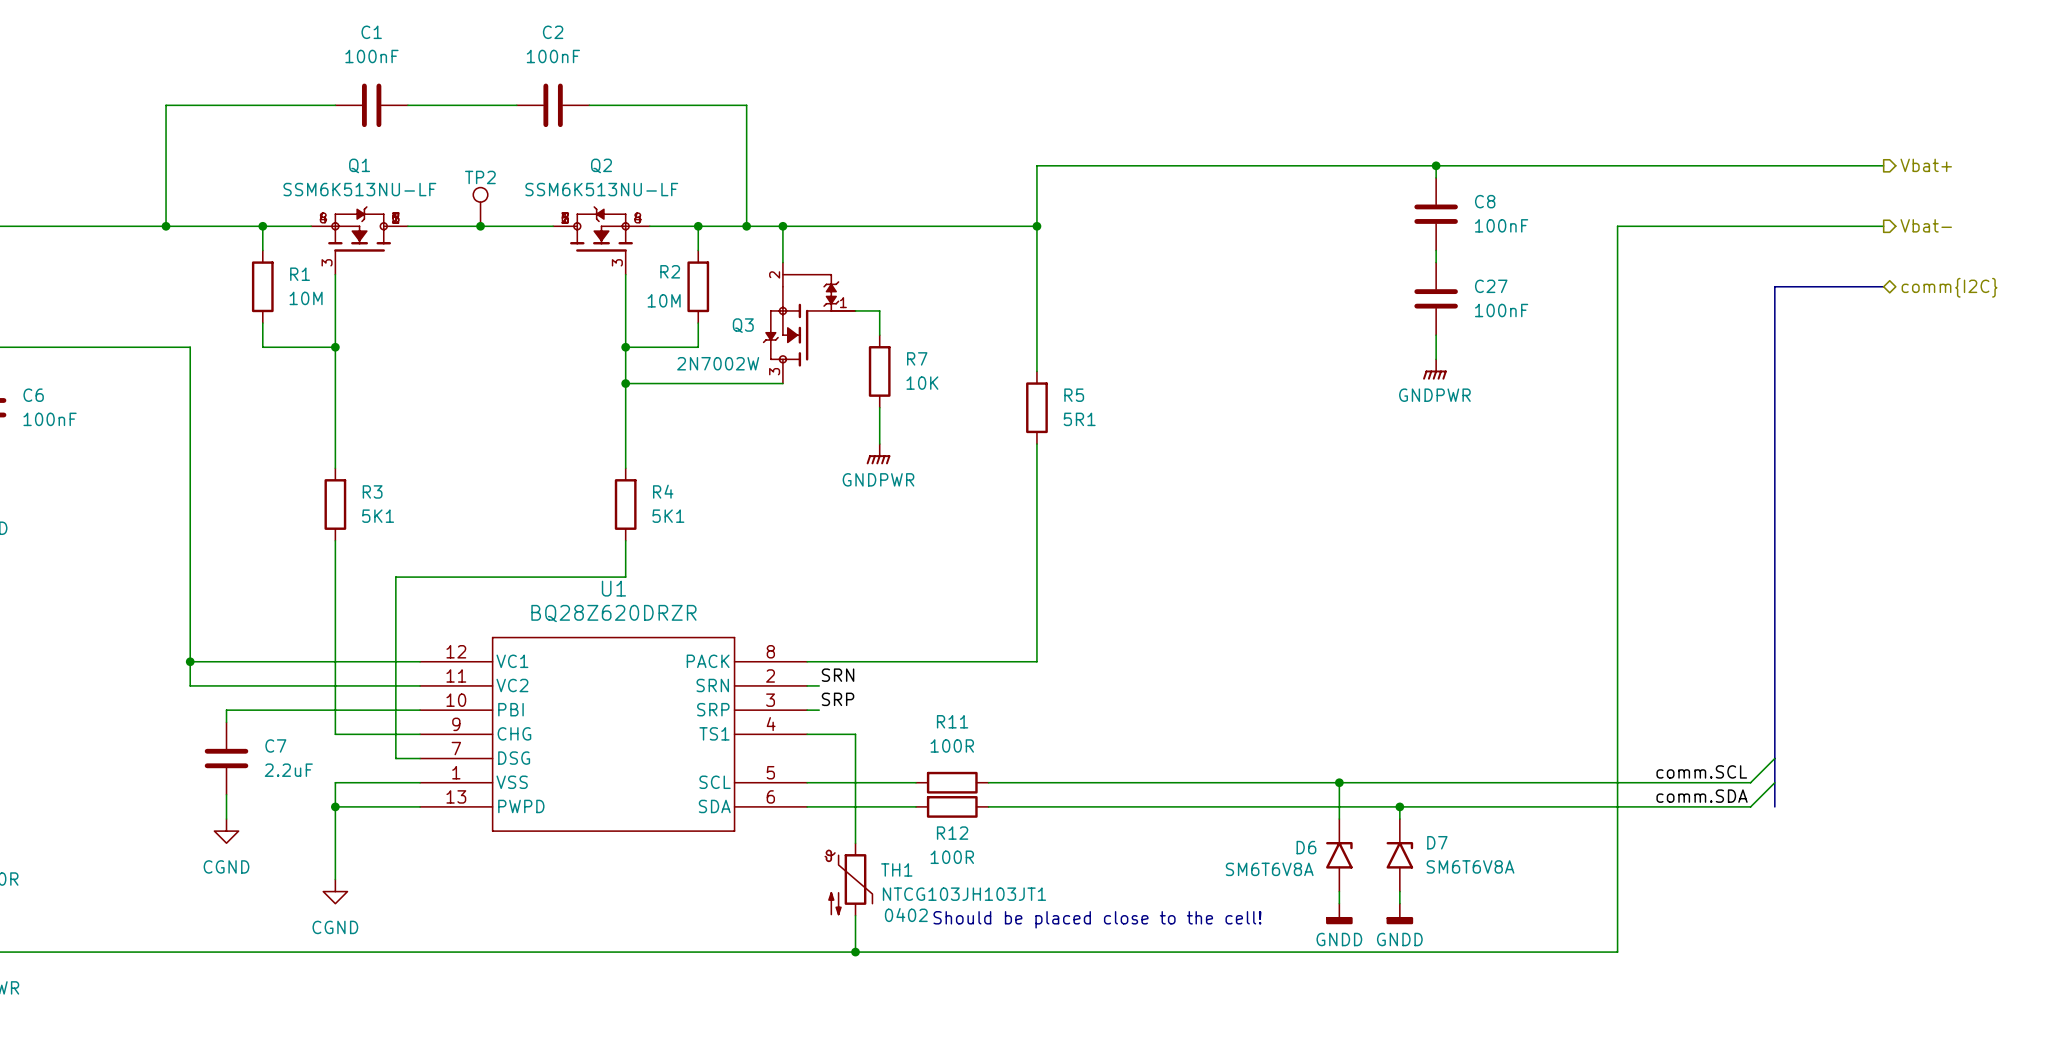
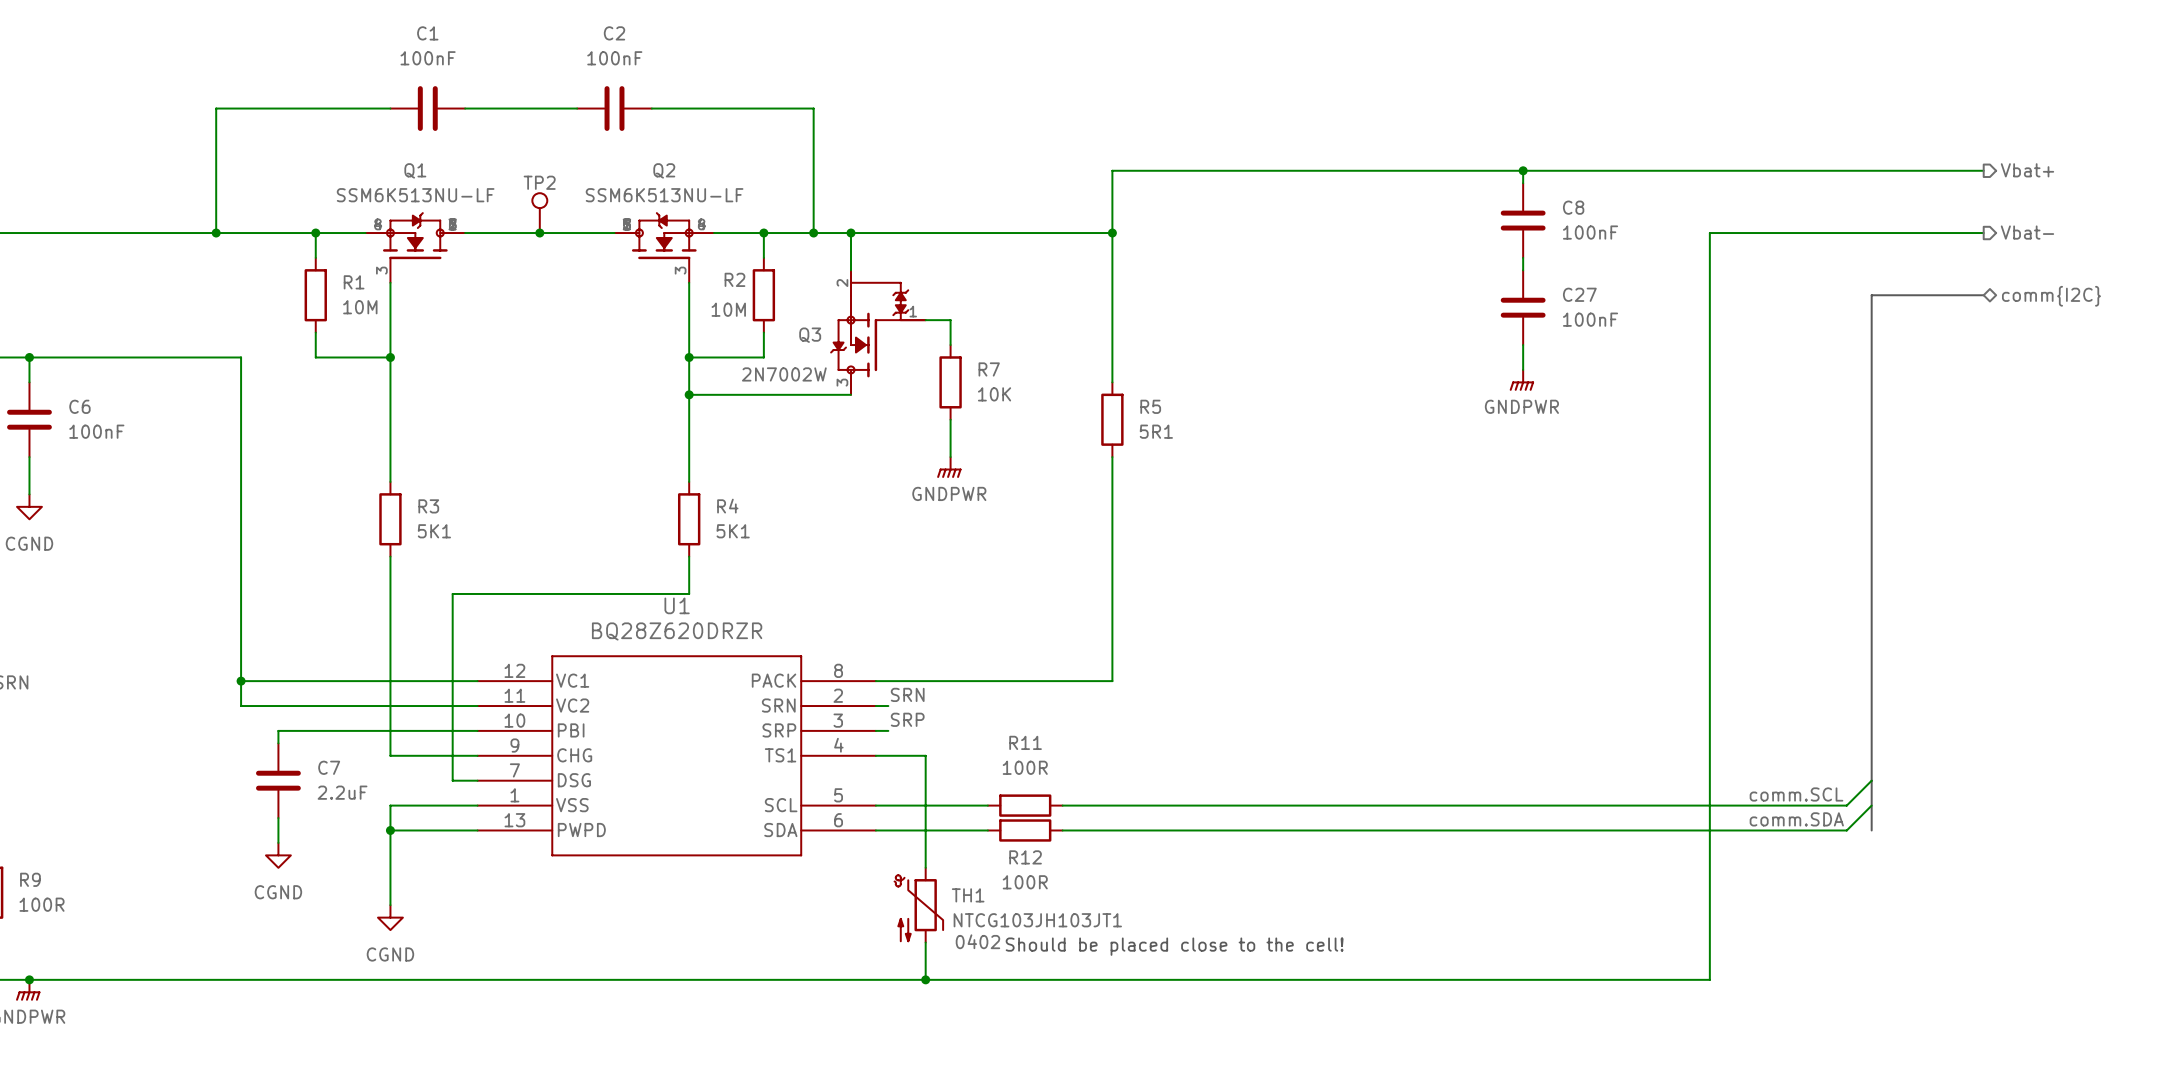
wire: (1339, 782) (1339, 819) -> none
junction: (1339, 782) -> none
wire: (1399, 806) (1399, 819) -> none
junction: (1399, 806) -> none
D6: SM6T6V8A (1339, 855) -> none
D7: SM6T6V8A (1399, 855) -> none
wire: (1339, 891) (1339, 903) -> none
wire: (1399, 891) (1399, 903) -> none
power symbol: GNDD (1339, 913) -> none
power symbol: GNDD (1399, 913) -> none

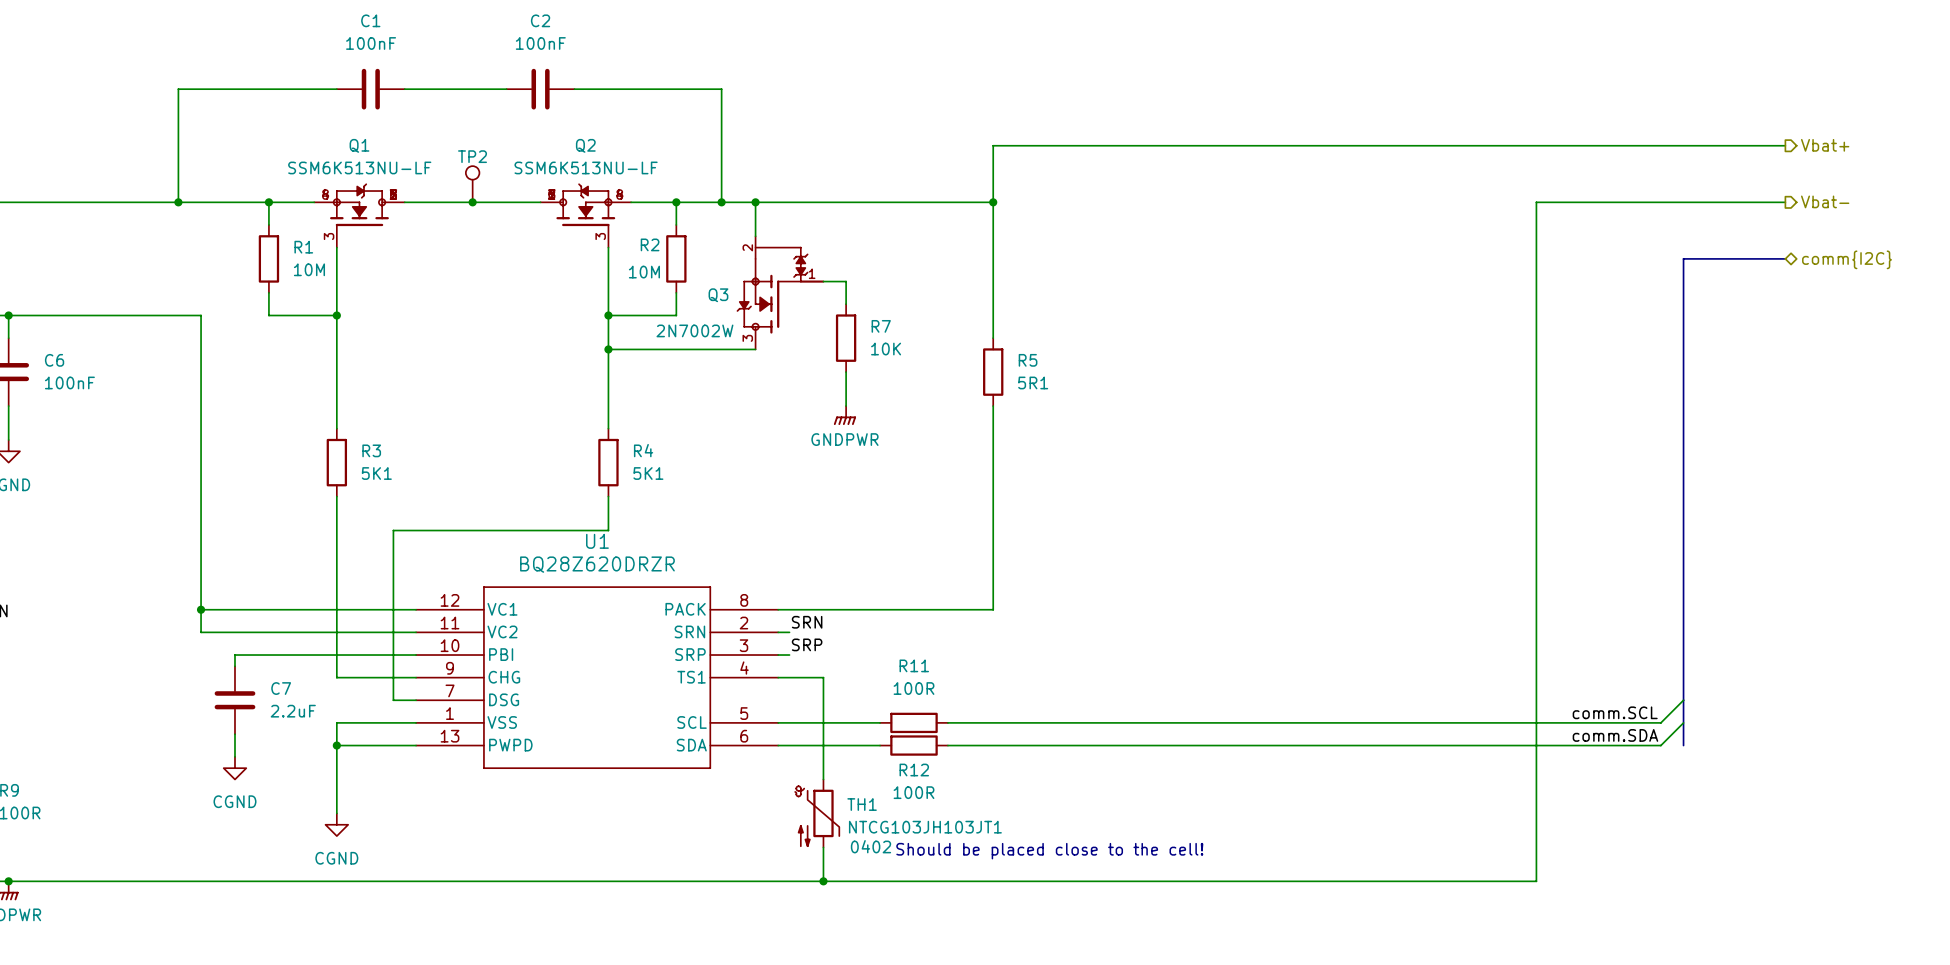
wire: (1523, 170) (1523, 183) -> none
junction: (1523, 170) -> none
C8: 100nF (1523, 220) -> none
wire: (1523, 257) (1523, 270) -> none
C27: 100nF (1523, 307) -> none
wire: (1523, 345) (1523, 369) -> none
power symbol: GNDPWR (1521, 380) -> none

